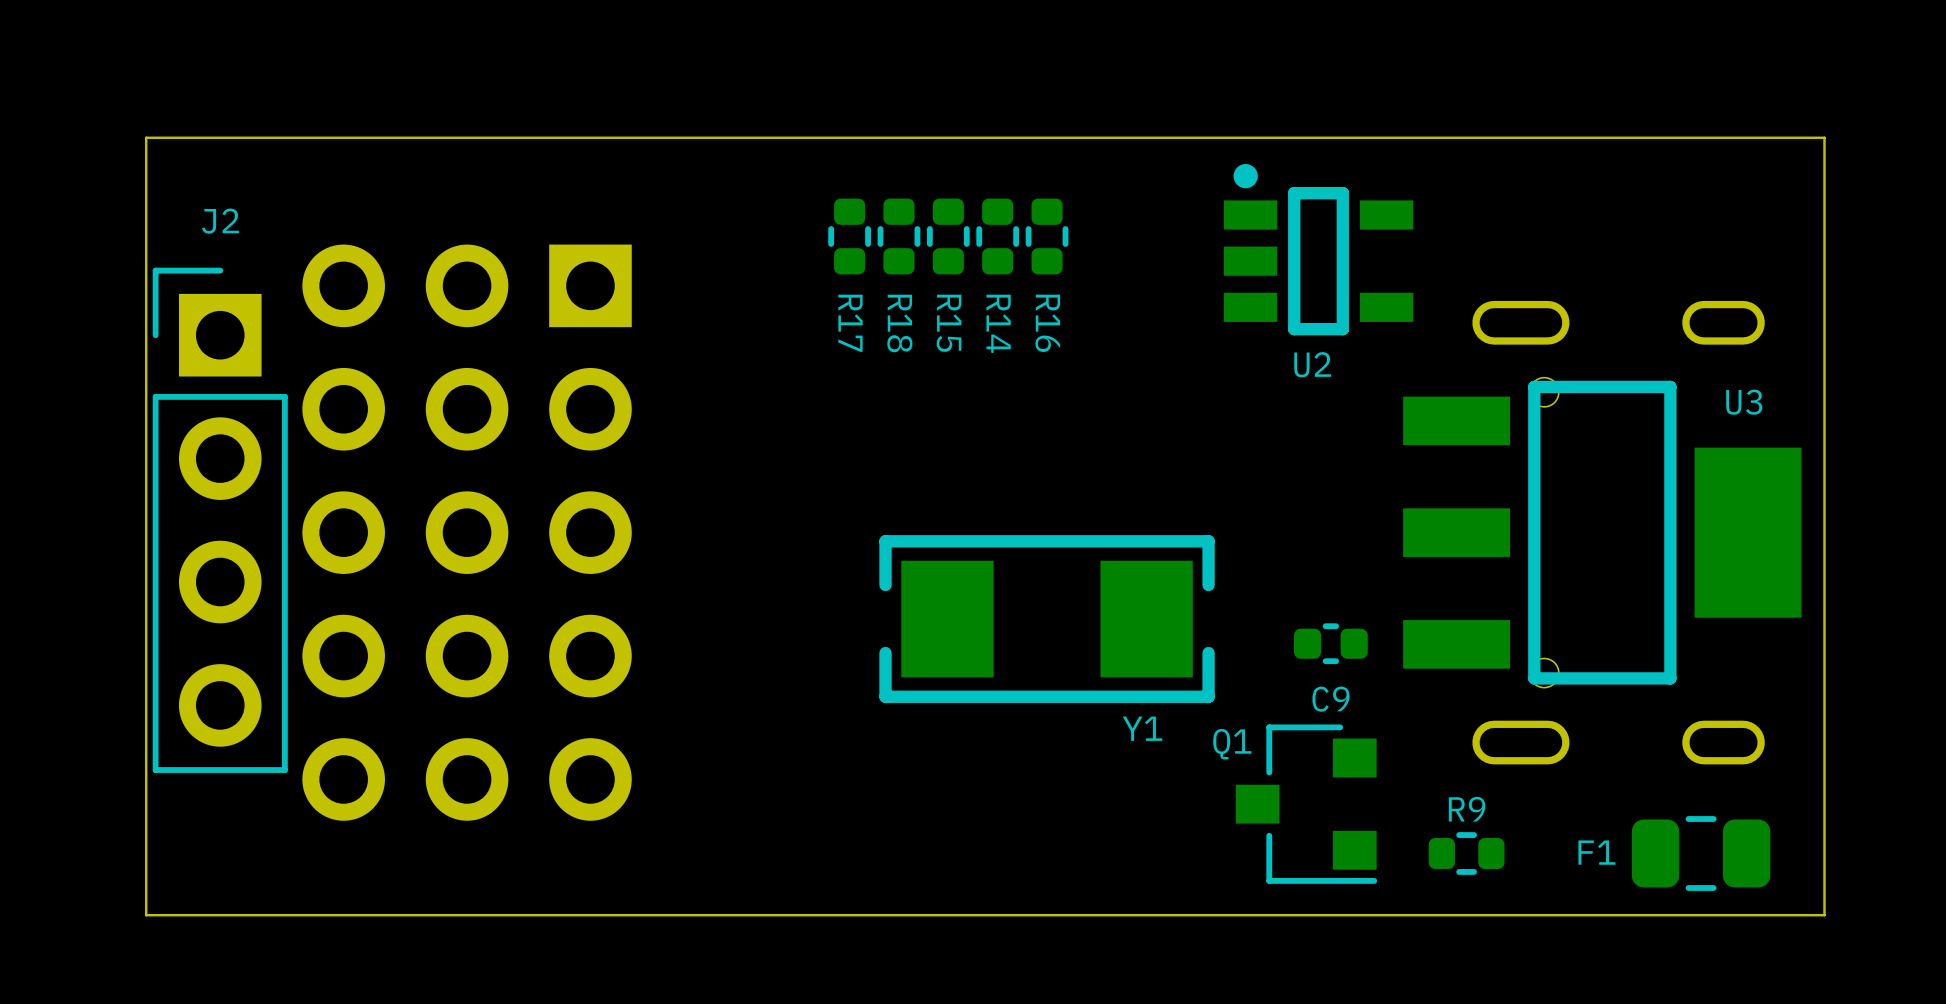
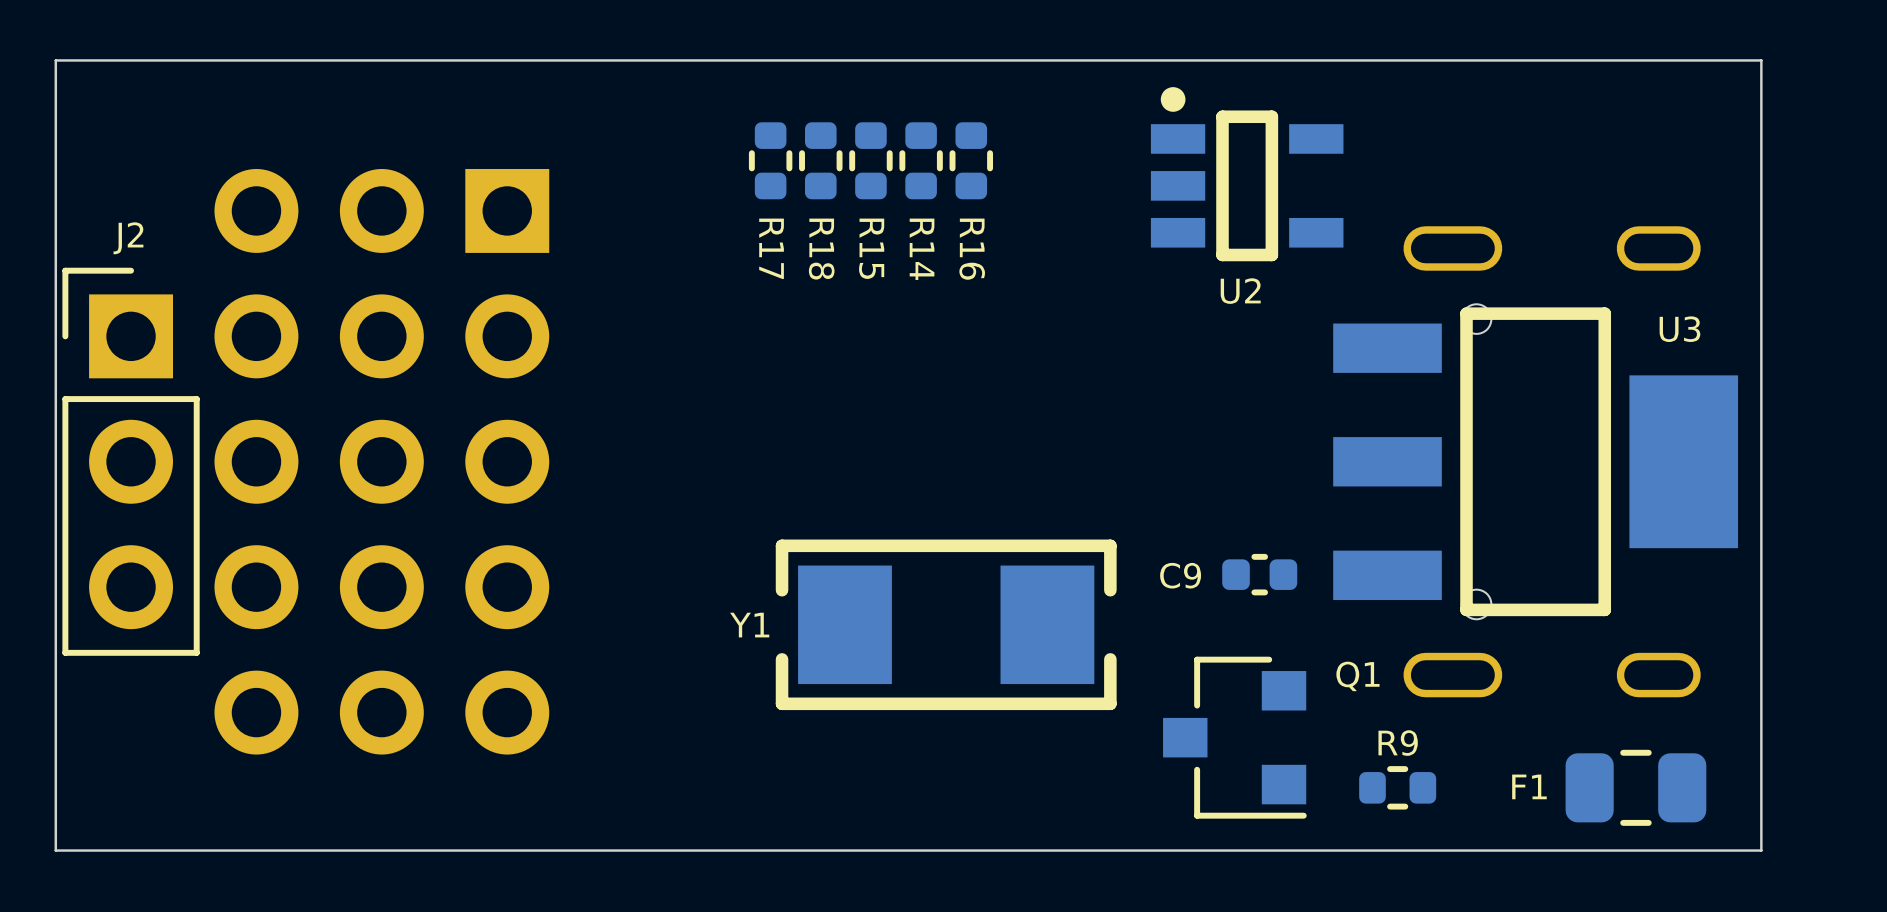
J2 footprint: [152, 267, 288, 773] -> [62, 267, 200, 656]
Y1 position: (1047, 619) -> (946, 624)
C9 name position: C9 (1330, 699) -> C9 (1180, 575)
Y1 name position: Y1 (1142, 728) -> Y1 (749, 625)
Q1 name position: Q1 (1232, 744) -> Q1 (1357, 676)

